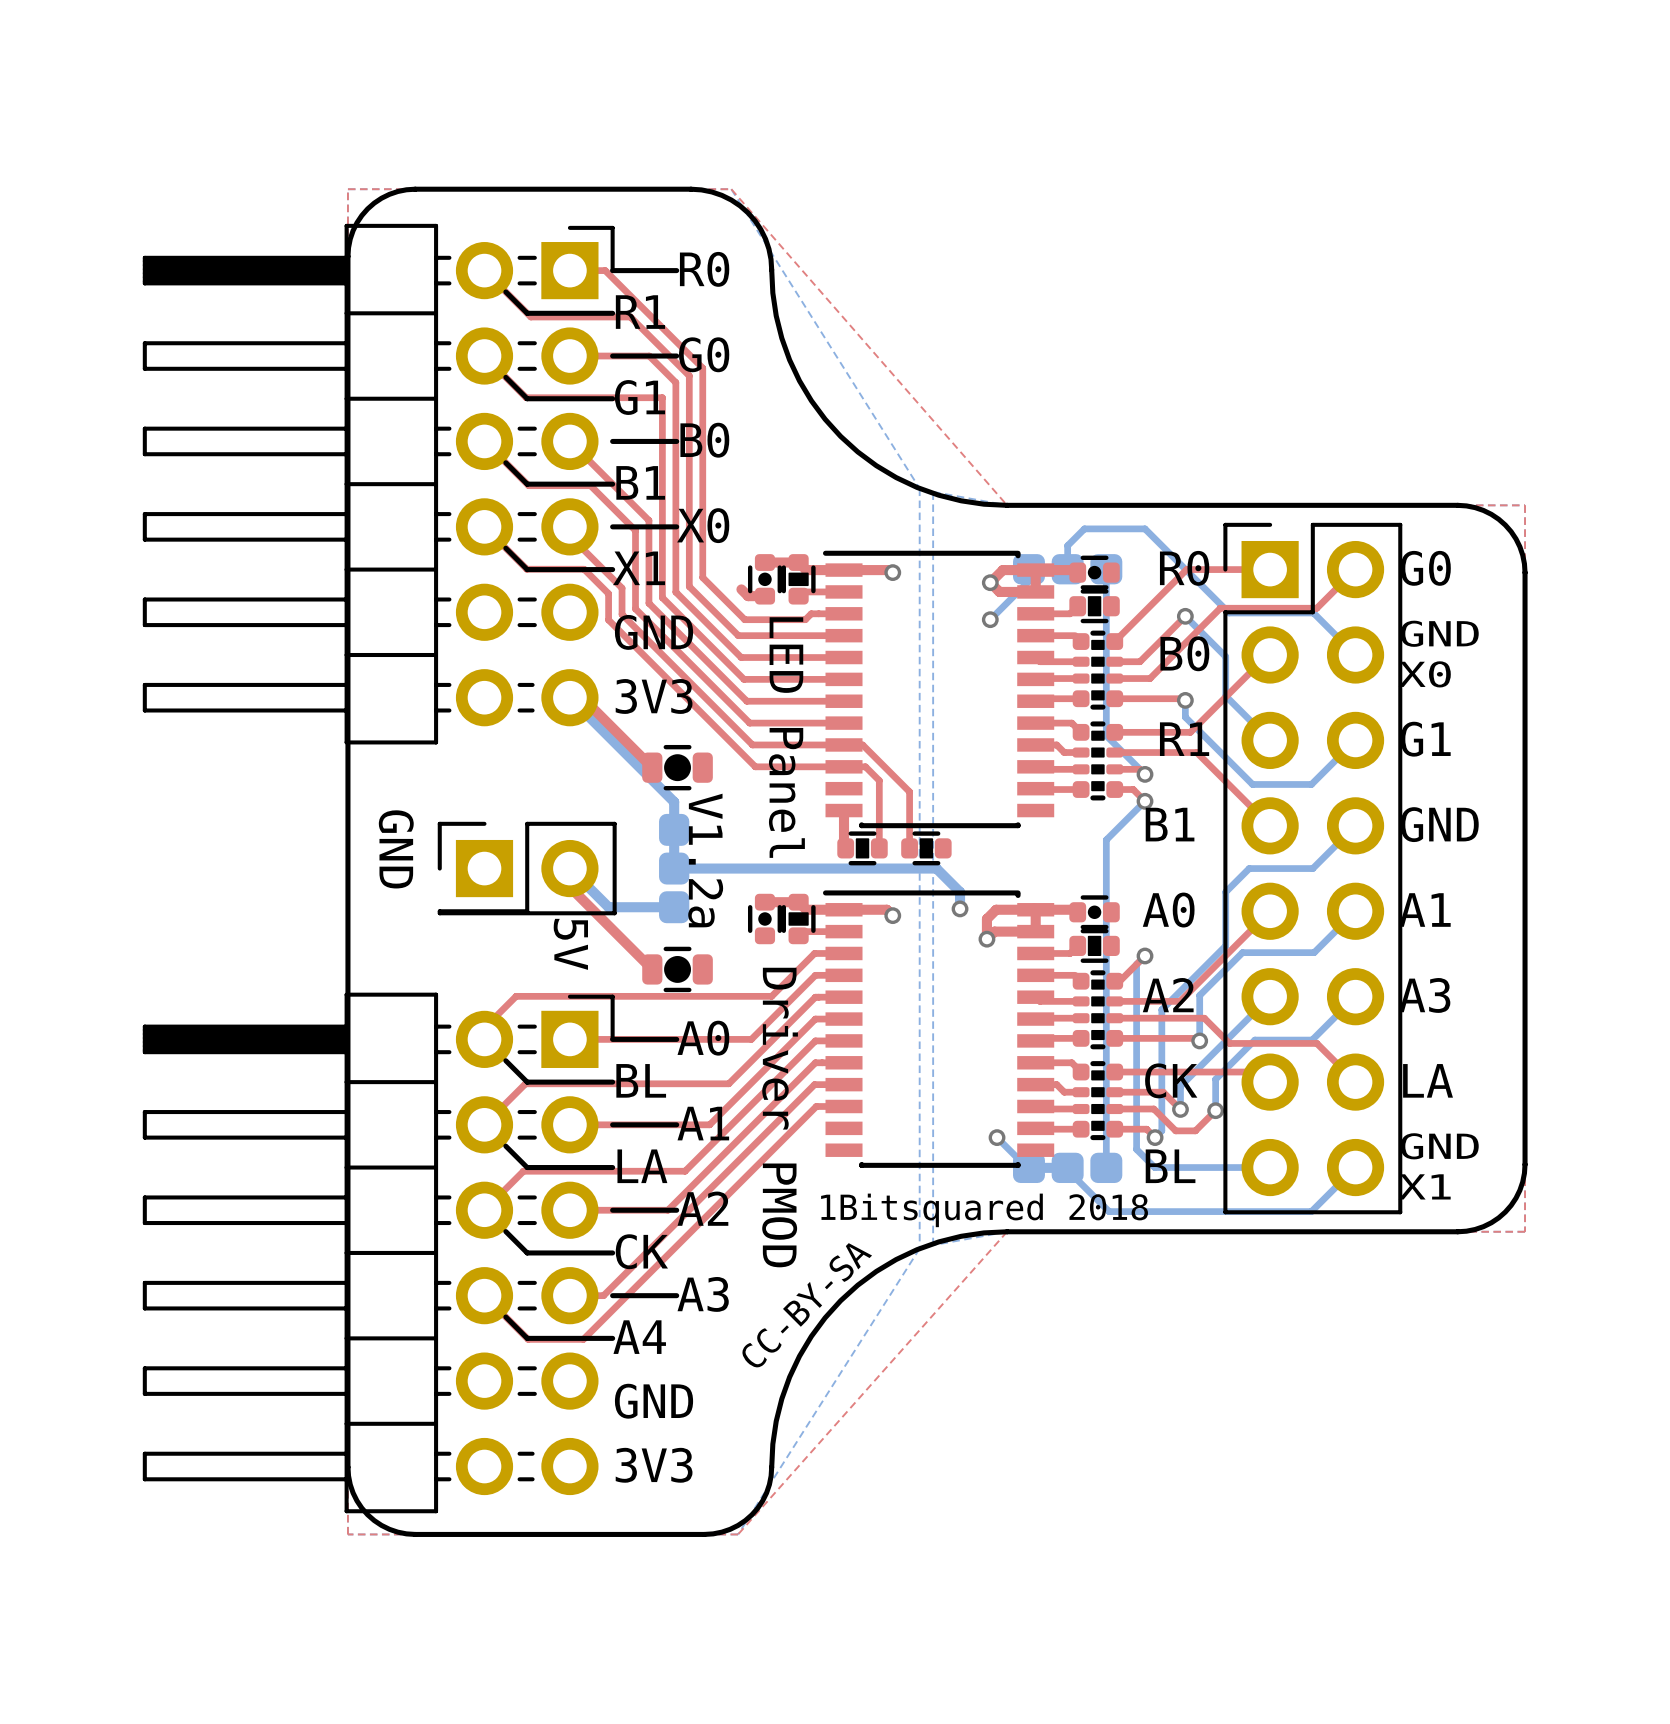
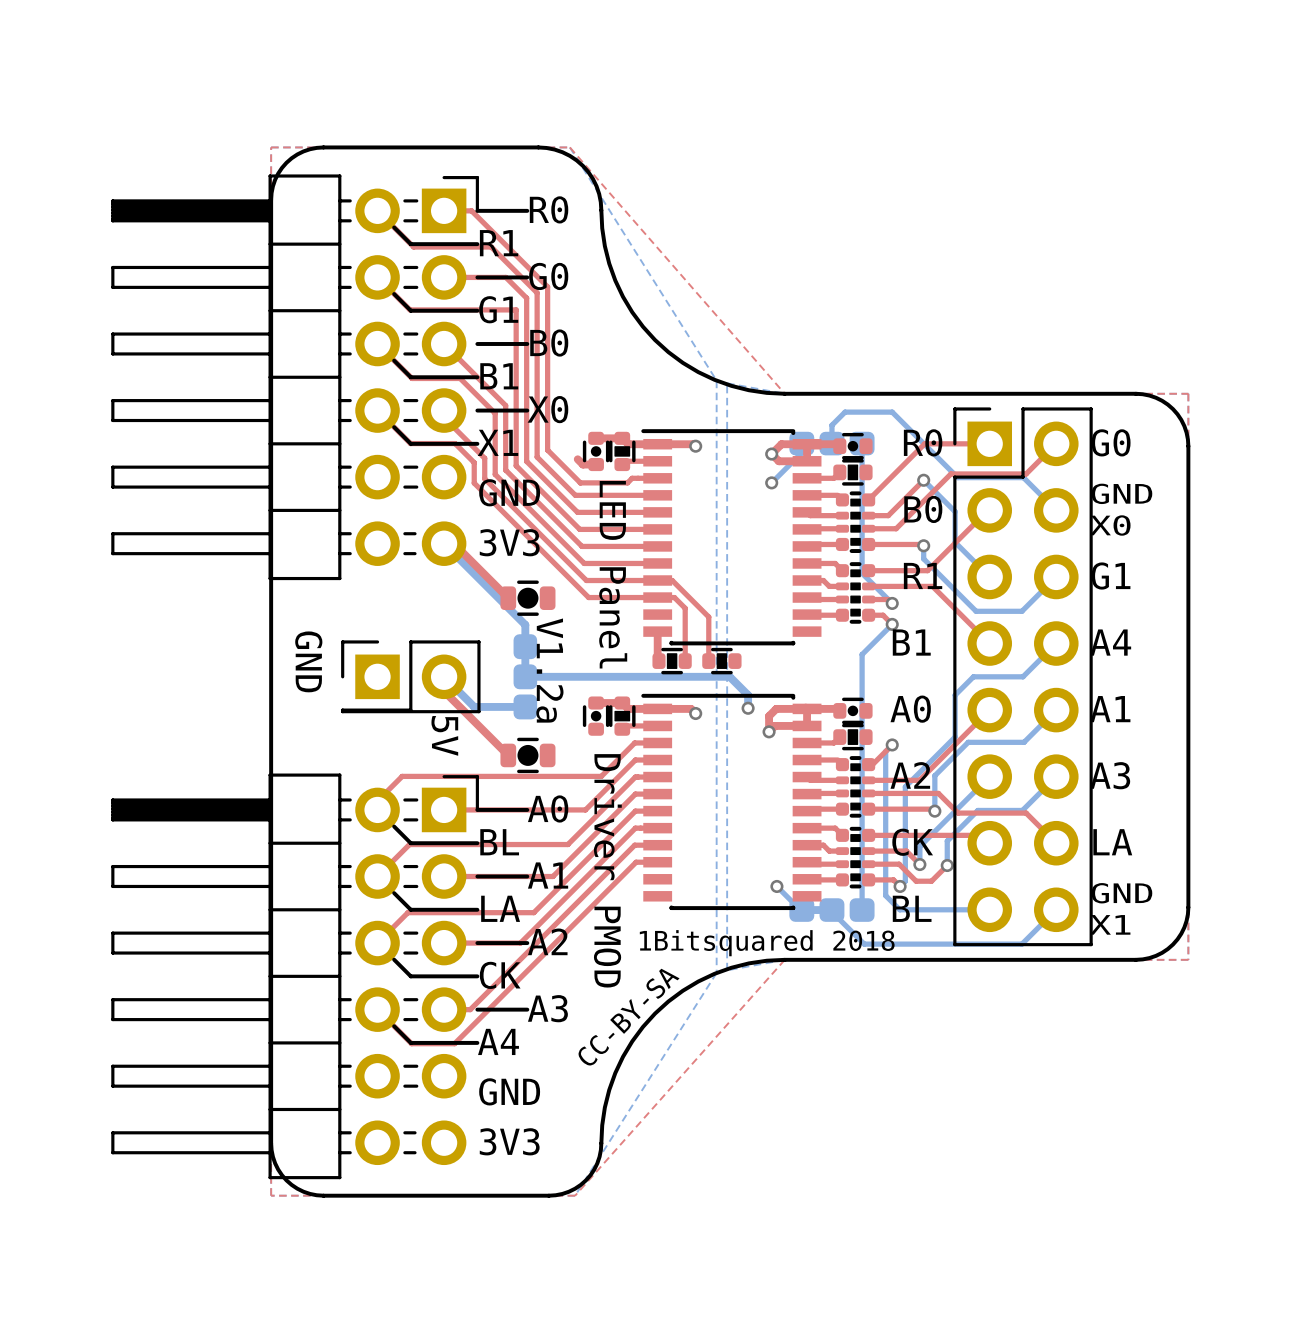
text: GND (1439, 824) -> A4 (1110, 642)

